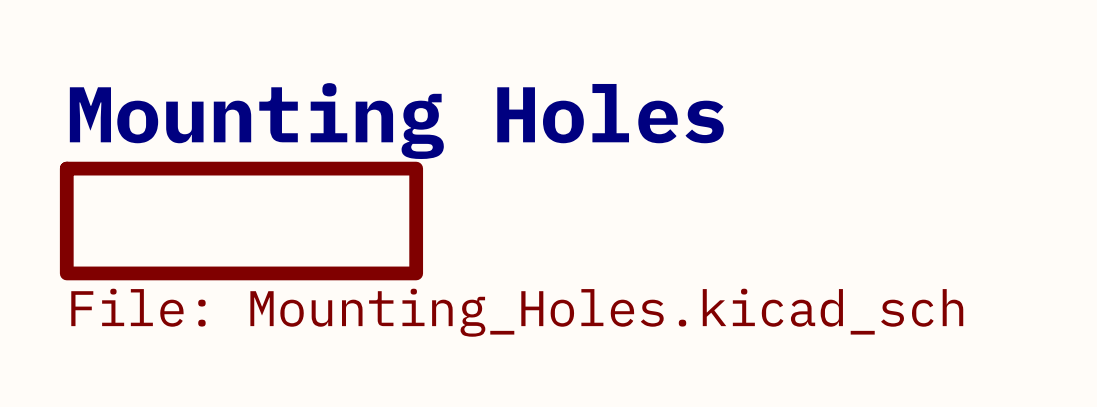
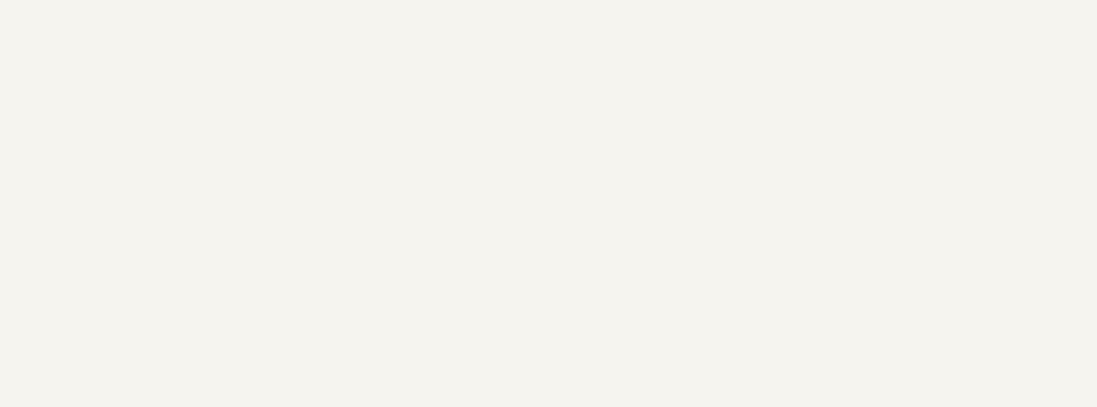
sheet Mounting Holes: File: Mounting_Holes.kicad_sch (241, 221) -> none

